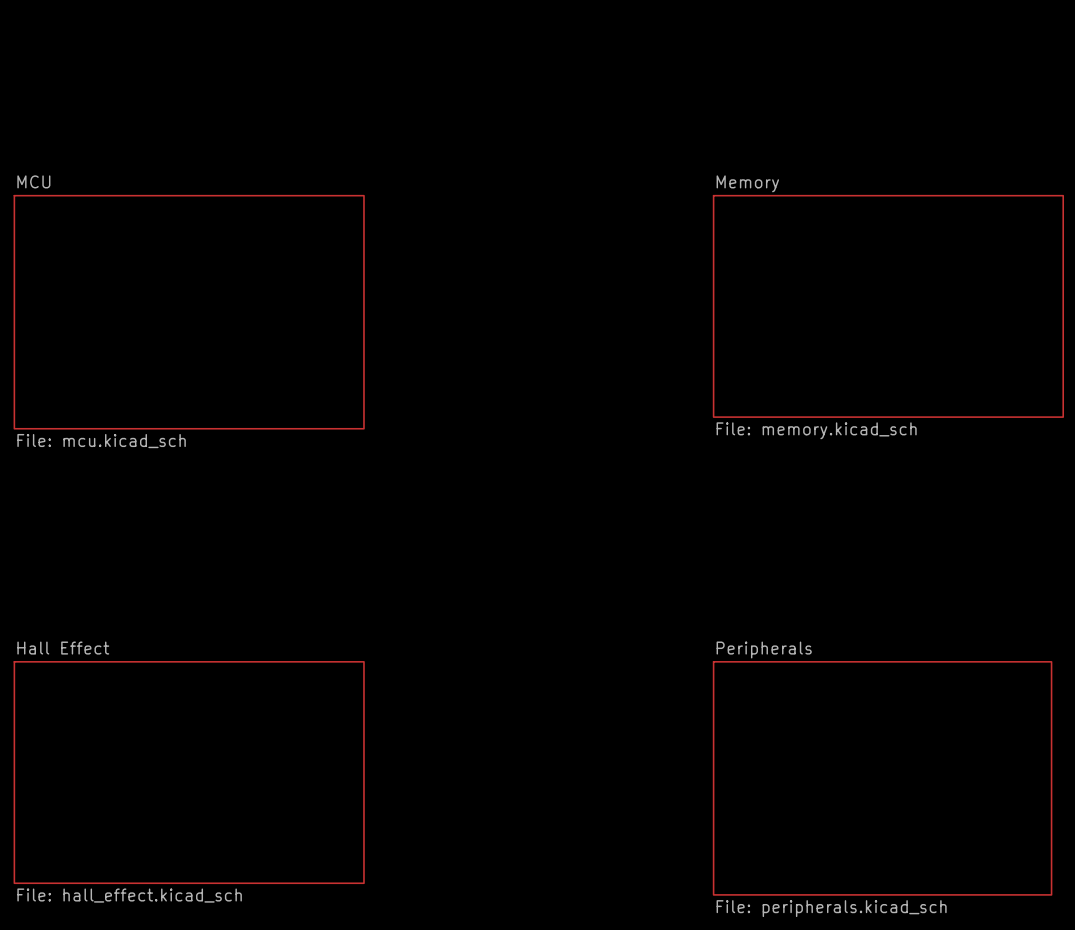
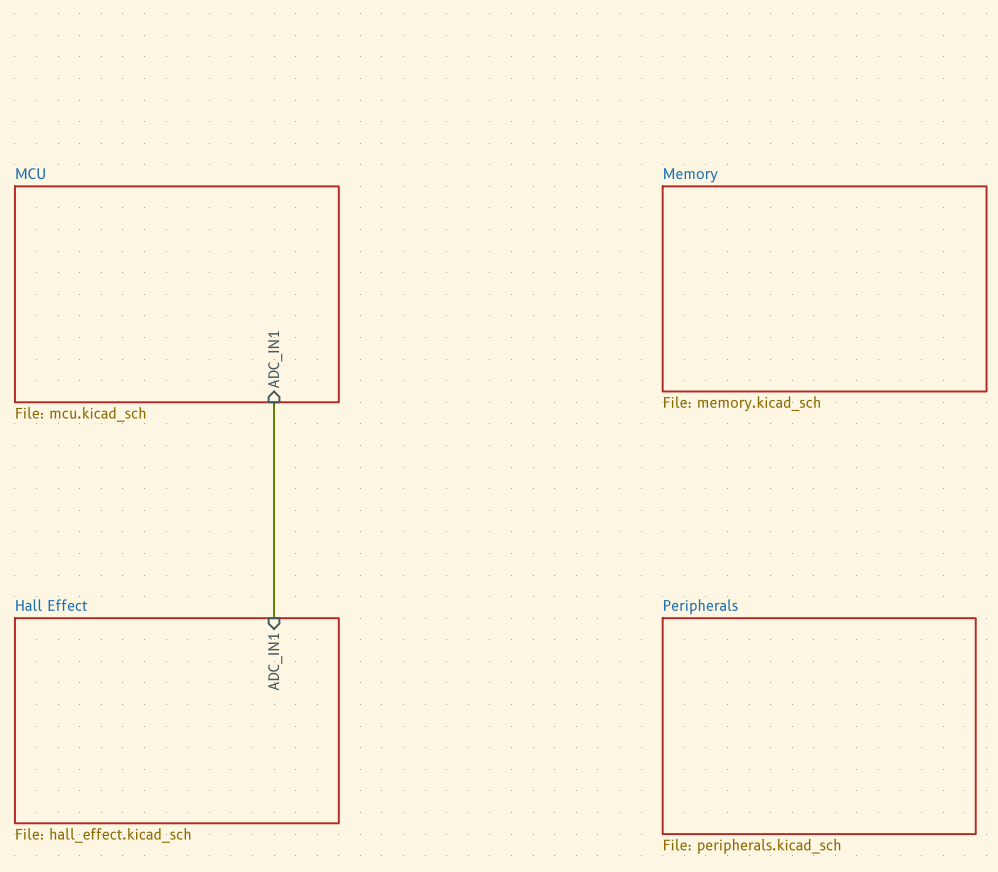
sheet pin: none -> ADC_IN1 (275, 359)
wire: none -> (274, 402) (274, 618)
sheet pin: none -> ADC_IN1 (275, 662)

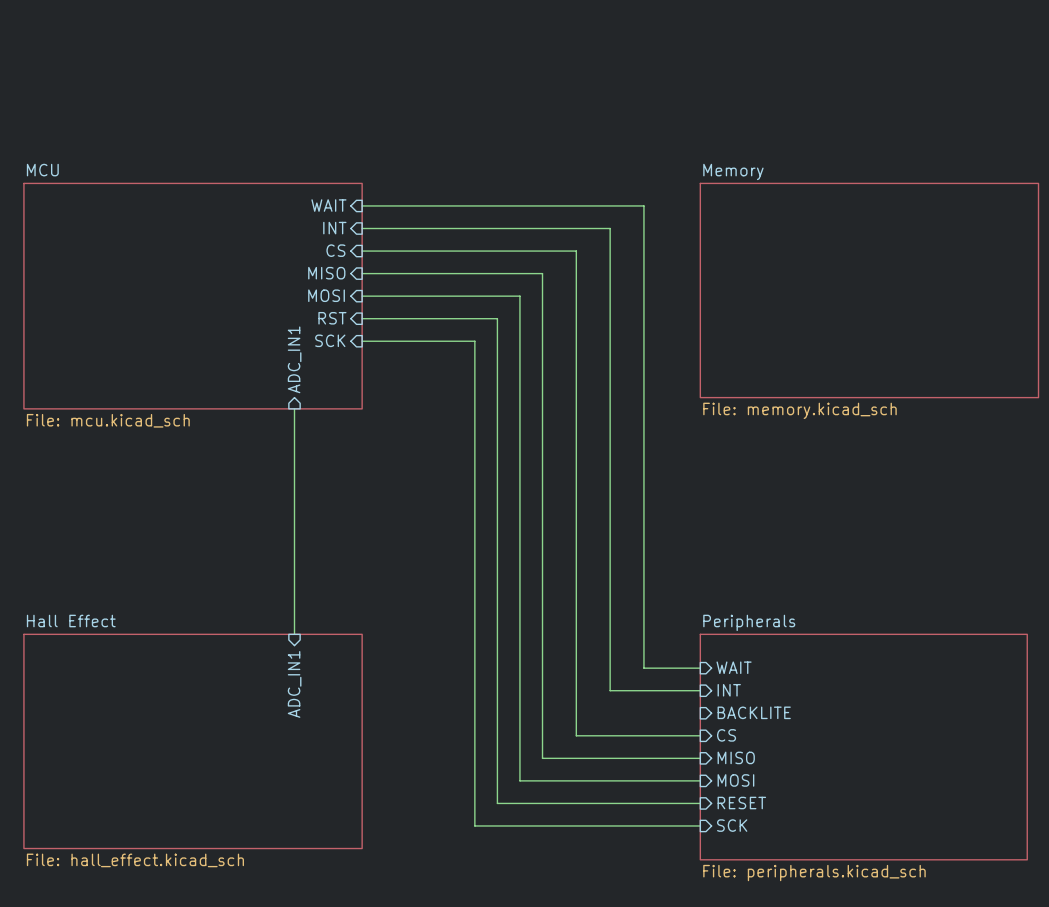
sheet pin: none -> WAIT (328, 205)
wire: none -> (362, 205) (643, 205) (643, 668) (700, 668)
sheet pin: none -> INT (334, 228)
wire: none -> (362, 228) (610, 228) (610, 690) (700, 690)
sheet pin: none -> CS (335, 250)
wire: none -> (362, 251) (576, 251) (576, 735) (700, 735)
sheet pin: none -> MISO (326, 273)
wire: none -> (362, 273) (542, 273) (542, 758) (700, 758)
sheet pin: none -> MOSI (326, 295)
wire: none -> (362, 296) (519, 296) (519, 780) (700, 780)
sheet pin: none -> RST (332, 318)
wire: none -> (362, 318) (497, 318) (497, 803) (700, 803)
sheet pin: none -> SCK (330, 340)
wire: none -> (362, 341) (474, 341) (474, 825) (700, 825)
sheet pin: none -> WAIT (734, 667)
sheet pin: none -> INT (729, 690)
sheet pin: none -> BACKLITE (754, 712)
sheet pin: none -> CS (726, 735)
sheet pin: none -> MISO (736, 757)
sheet pin: none -> MOSI (735, 780)
sheet pin: none -> RESET (741, 803)
sheet pin: none -> SCK (732, 825)

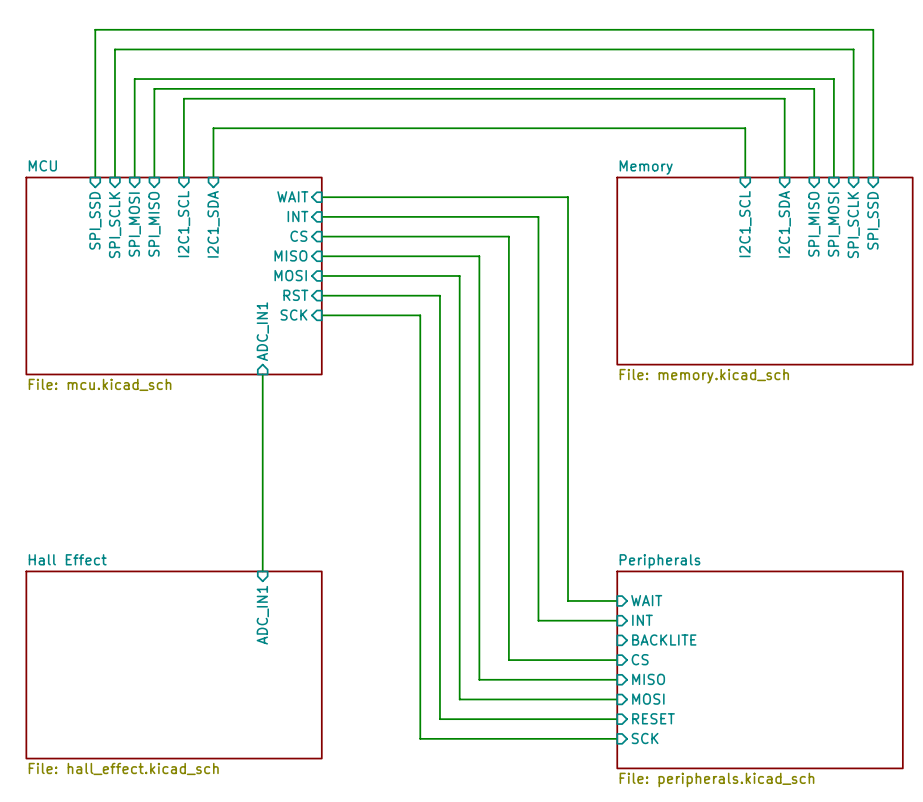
wire: none -> (95, 177) (95, 29) (873, 29) (873, 177)
wire: none -> (114, 177) (114, 49) (853, 49) (853, 177)
wire: none -> (134, 177) (134, 79) (833, 79) (833, 177)
wire: none -> (154, 177) (154, 88) (814, 88) (814, 177)
wire: none -> (183, 177) (183, 98) (784, 98) (784, 177)
wire: none -> (213, 177) (213, 128) (745, 128) (745, 177)
sheet pin: none -> SPI_SSD (95, 220)
sheet pin: none -> SPI_SSD (873, 220)
sheet pin: none -> I2C1_SCL (184, 224)
sheet pin: none -> I2C1_SCL (745, 224)
sheet pin: none -> SPI_SCLK (115, 225)
sheet pin: none -> SPI_MOSI (134, 224)
sheet pin: none -> SPI_MISO (154, 224)
sheet pin: none -> I2C1_SDA (213, 224)
sheet pin: none -> I2C1_SDA (784, 224)
sheet pin: none -> SPI_MISO (814, 224)
sheet pin: none -> SPI_MOSI (834, 224)
sheet pin: none -> SPI_SCLK (853, 225)

